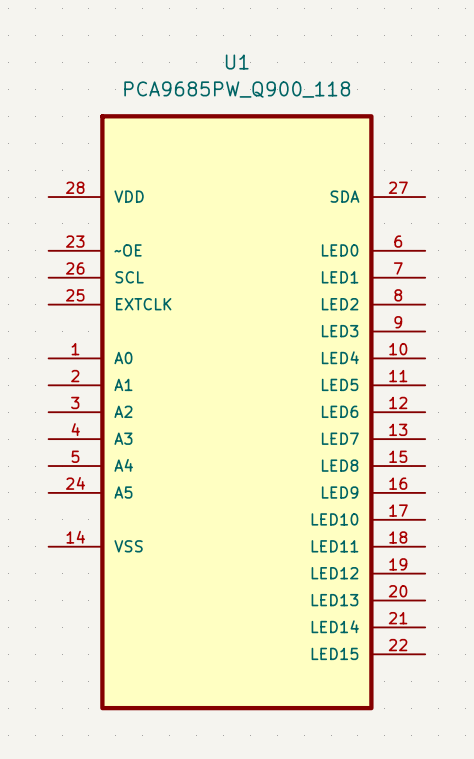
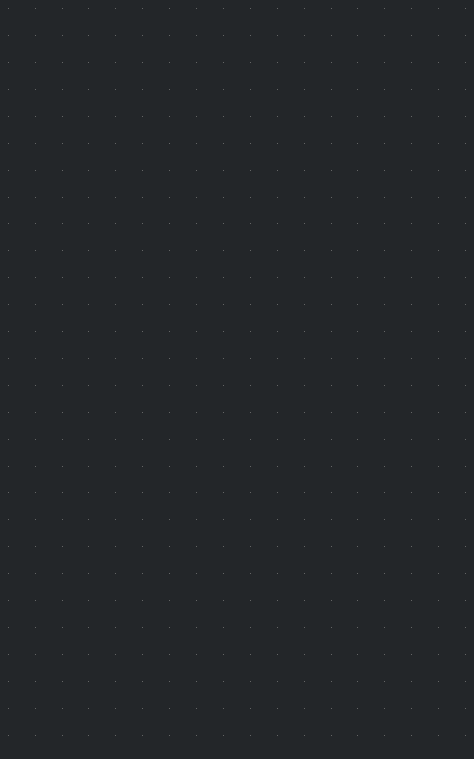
U1: PCA9685PW_Q900_118 (236, 412) -> none

